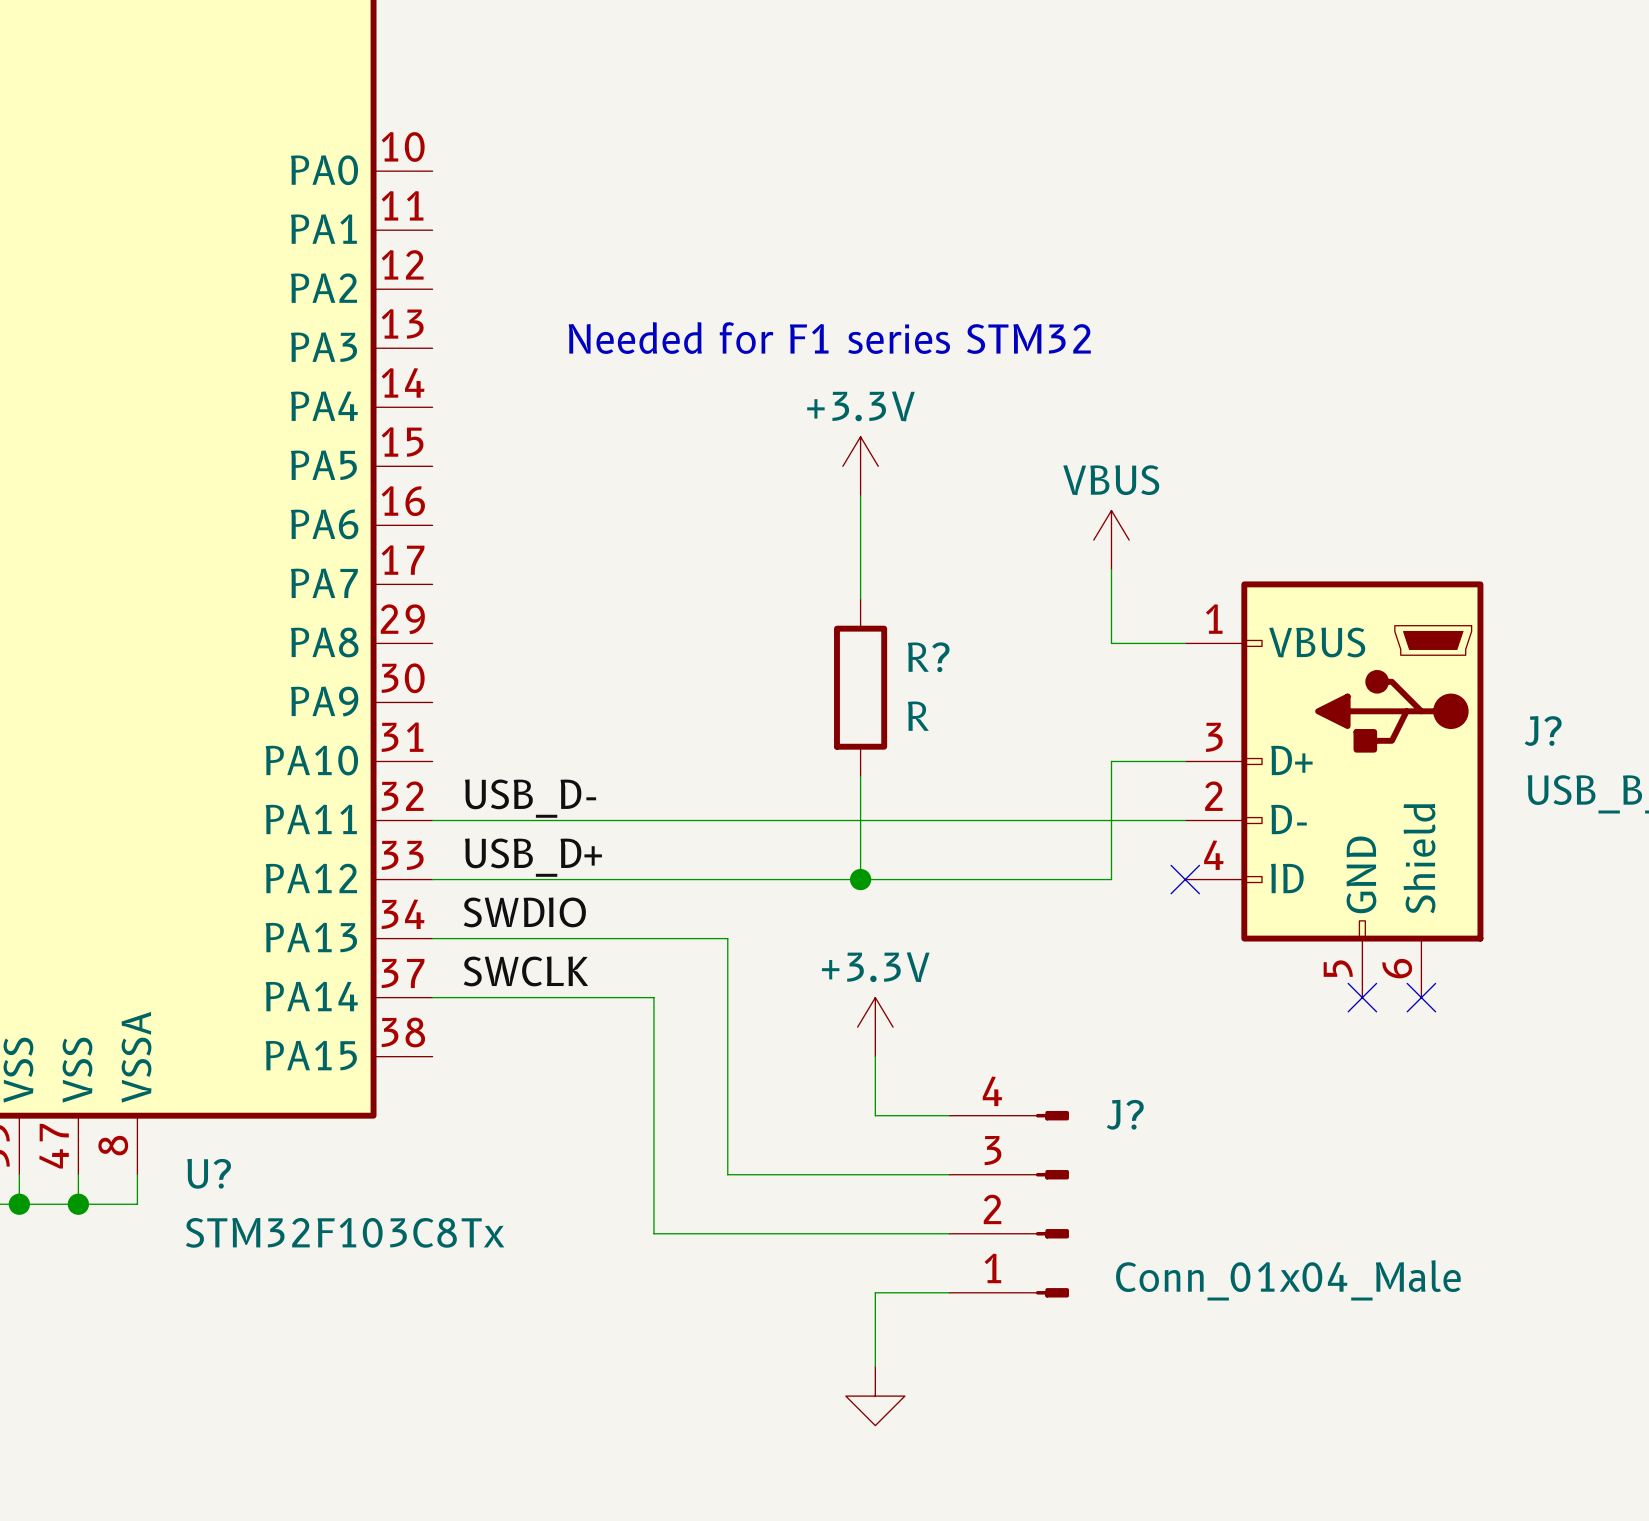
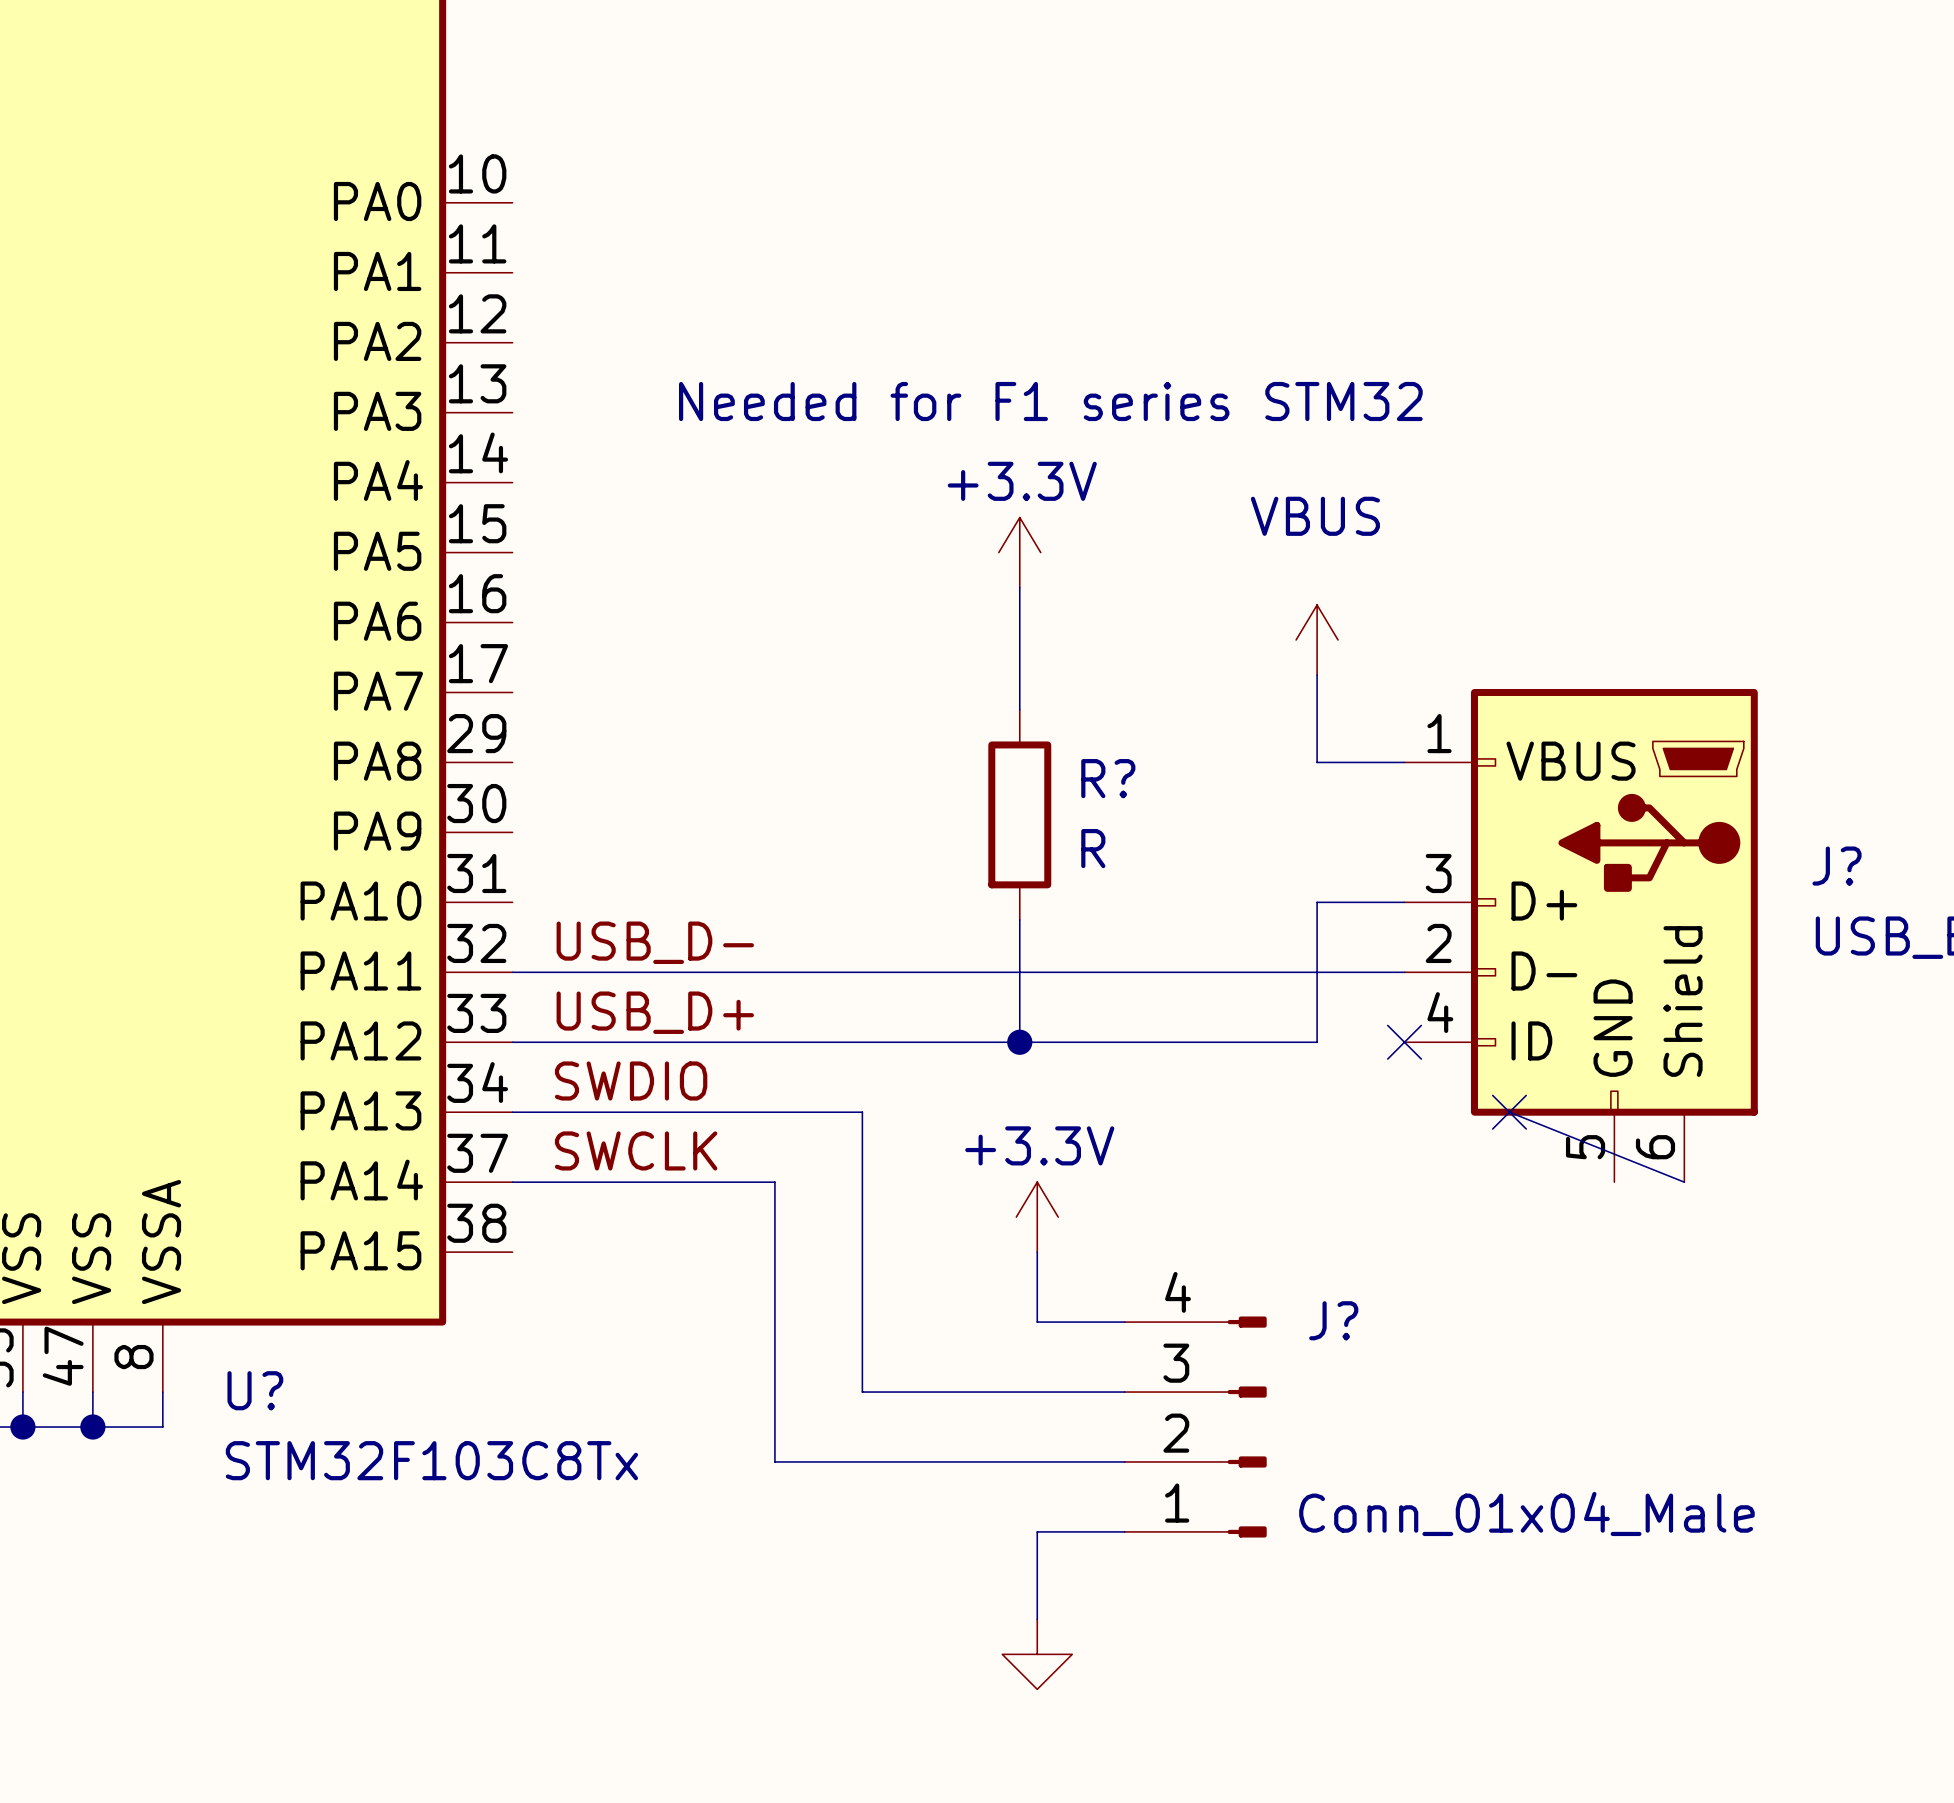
power symbol text position: VBUS (1111, 480) -> VBUS (1315, 516)
wire: none -> (1509, 1112) (1684, 1182)
no-connect mark: none -> (1509, 1112)
no-connect mark: (1362, 997) -> none
no-connect mark: (1421, 997) -> none

